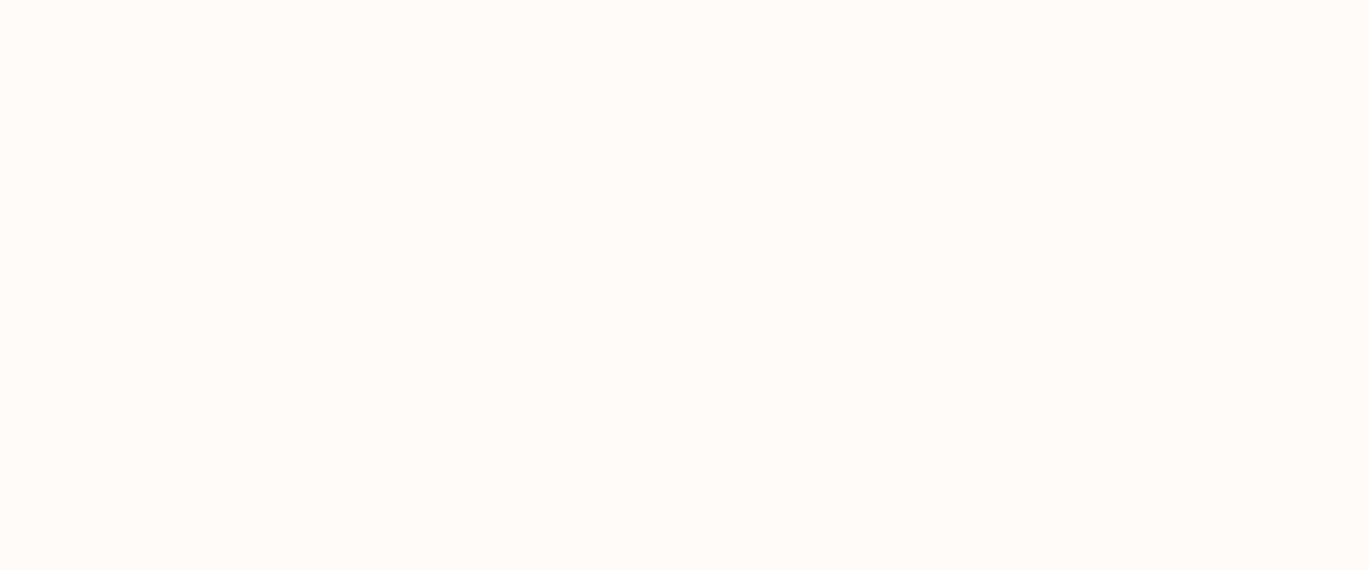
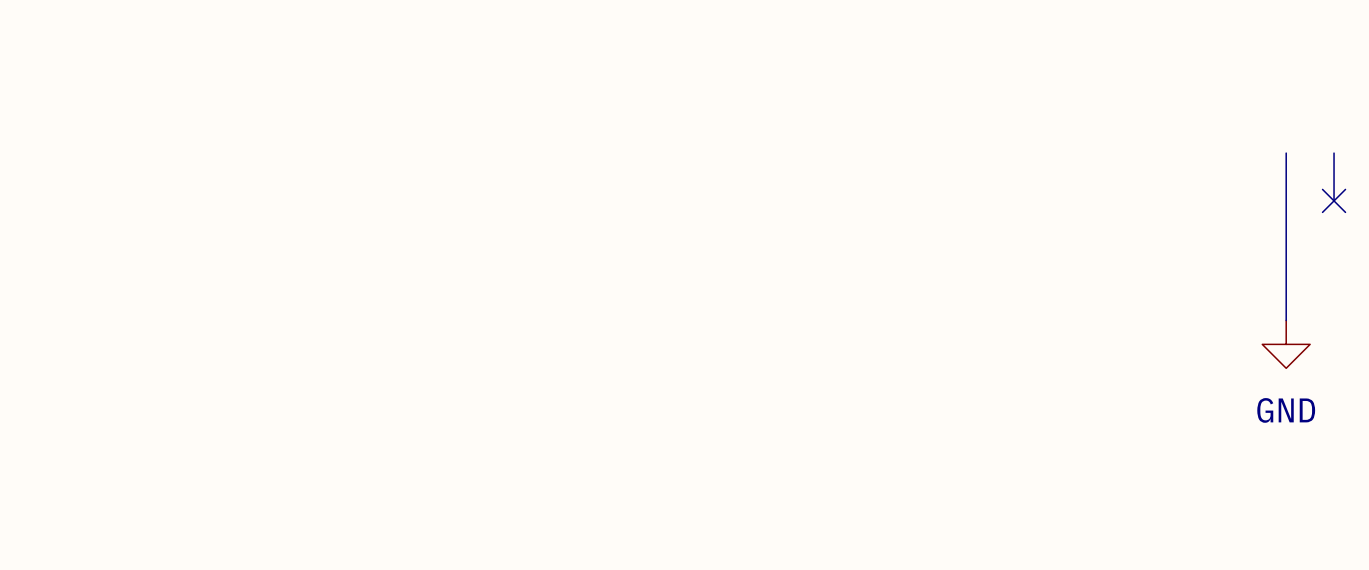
wire: none -> (1286, 153) (1286, 320)
wire: none -> (1334, 153) (1334, 200)
no-connect mark: none -> (1334, 200)
power symbol: none -> GND (1286, 344)

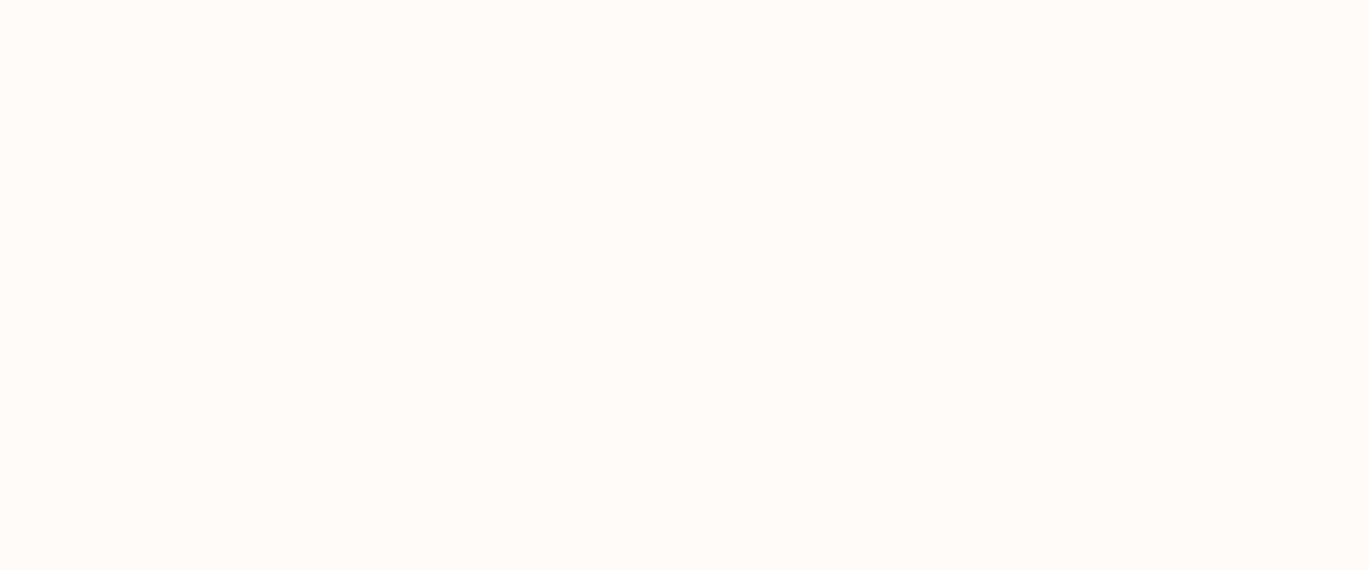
wire: (1286, 153) (1286, 320) -> none
wire: (1334, 153) (1334, 200) -> none
no-connect mark: (1334, 200) -> none
power symbol: GND (1286, 344) -> none

